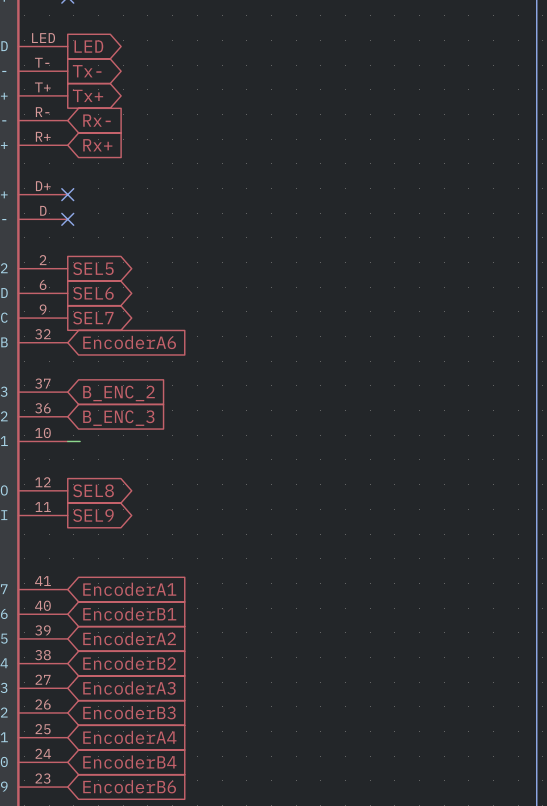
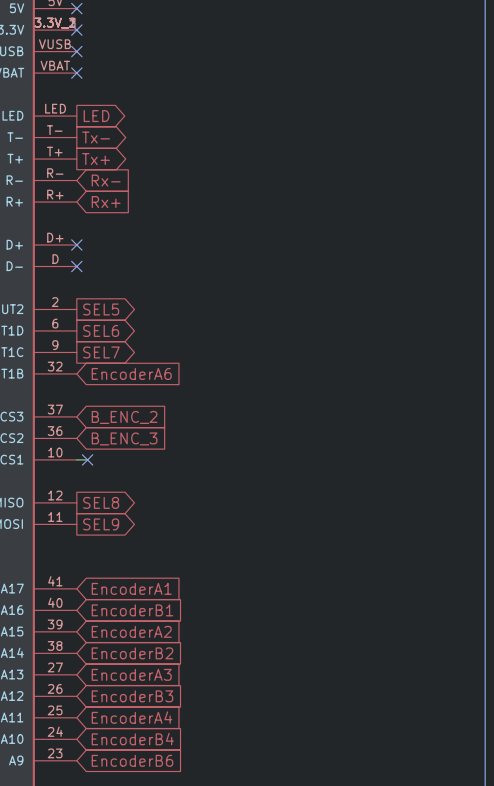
no-connect mark: none -> (87, 459)

